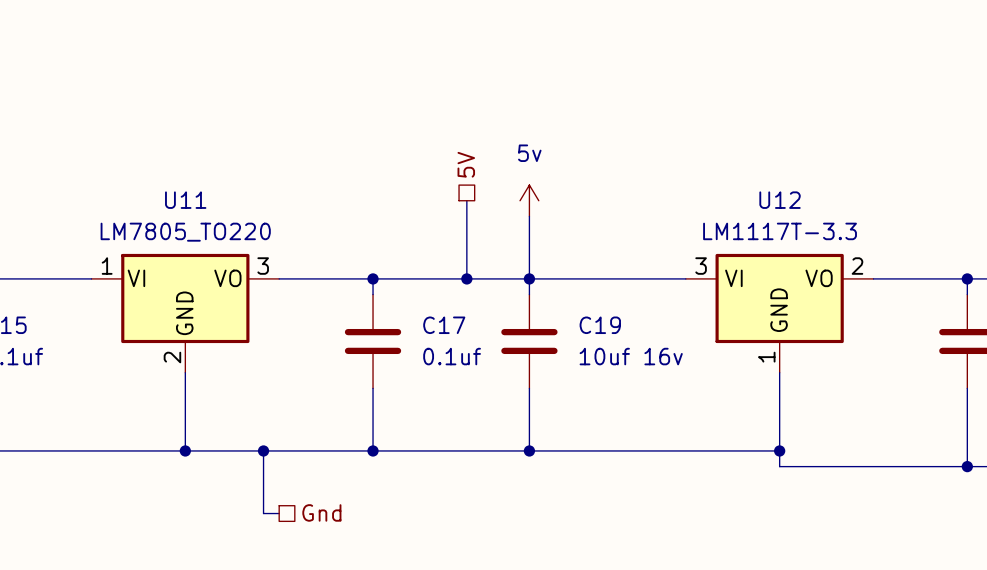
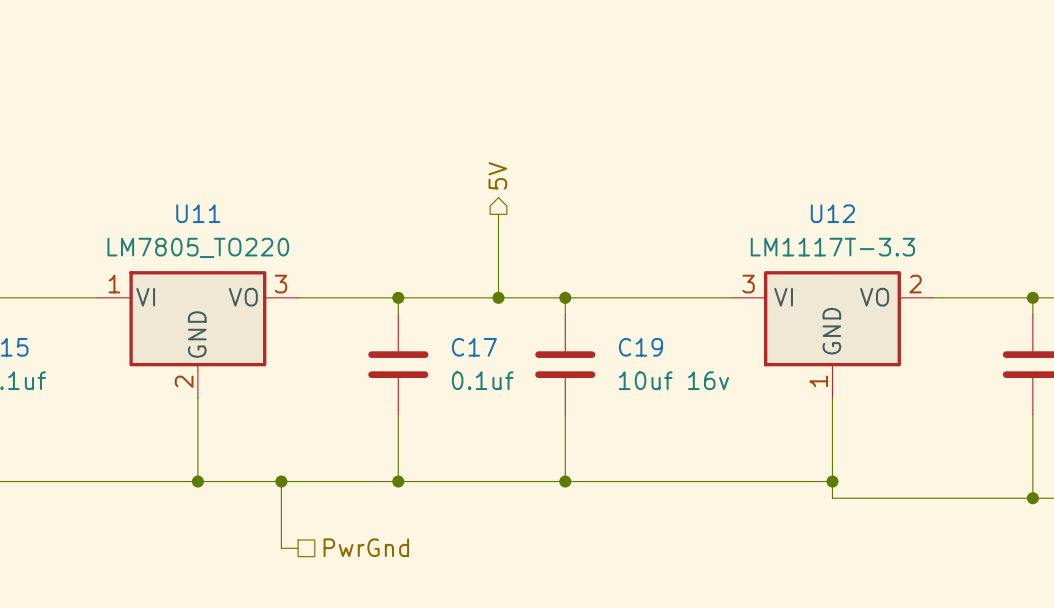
hierarchical label shape: passive (466, 164) -> output (497, 175)
power symbol: 5v (529, 200) -> none
wire: (529, 216) (529, 278) -> none
hierarchical label: Gnd (321, 512) -> PwrGnd (366, 547)

